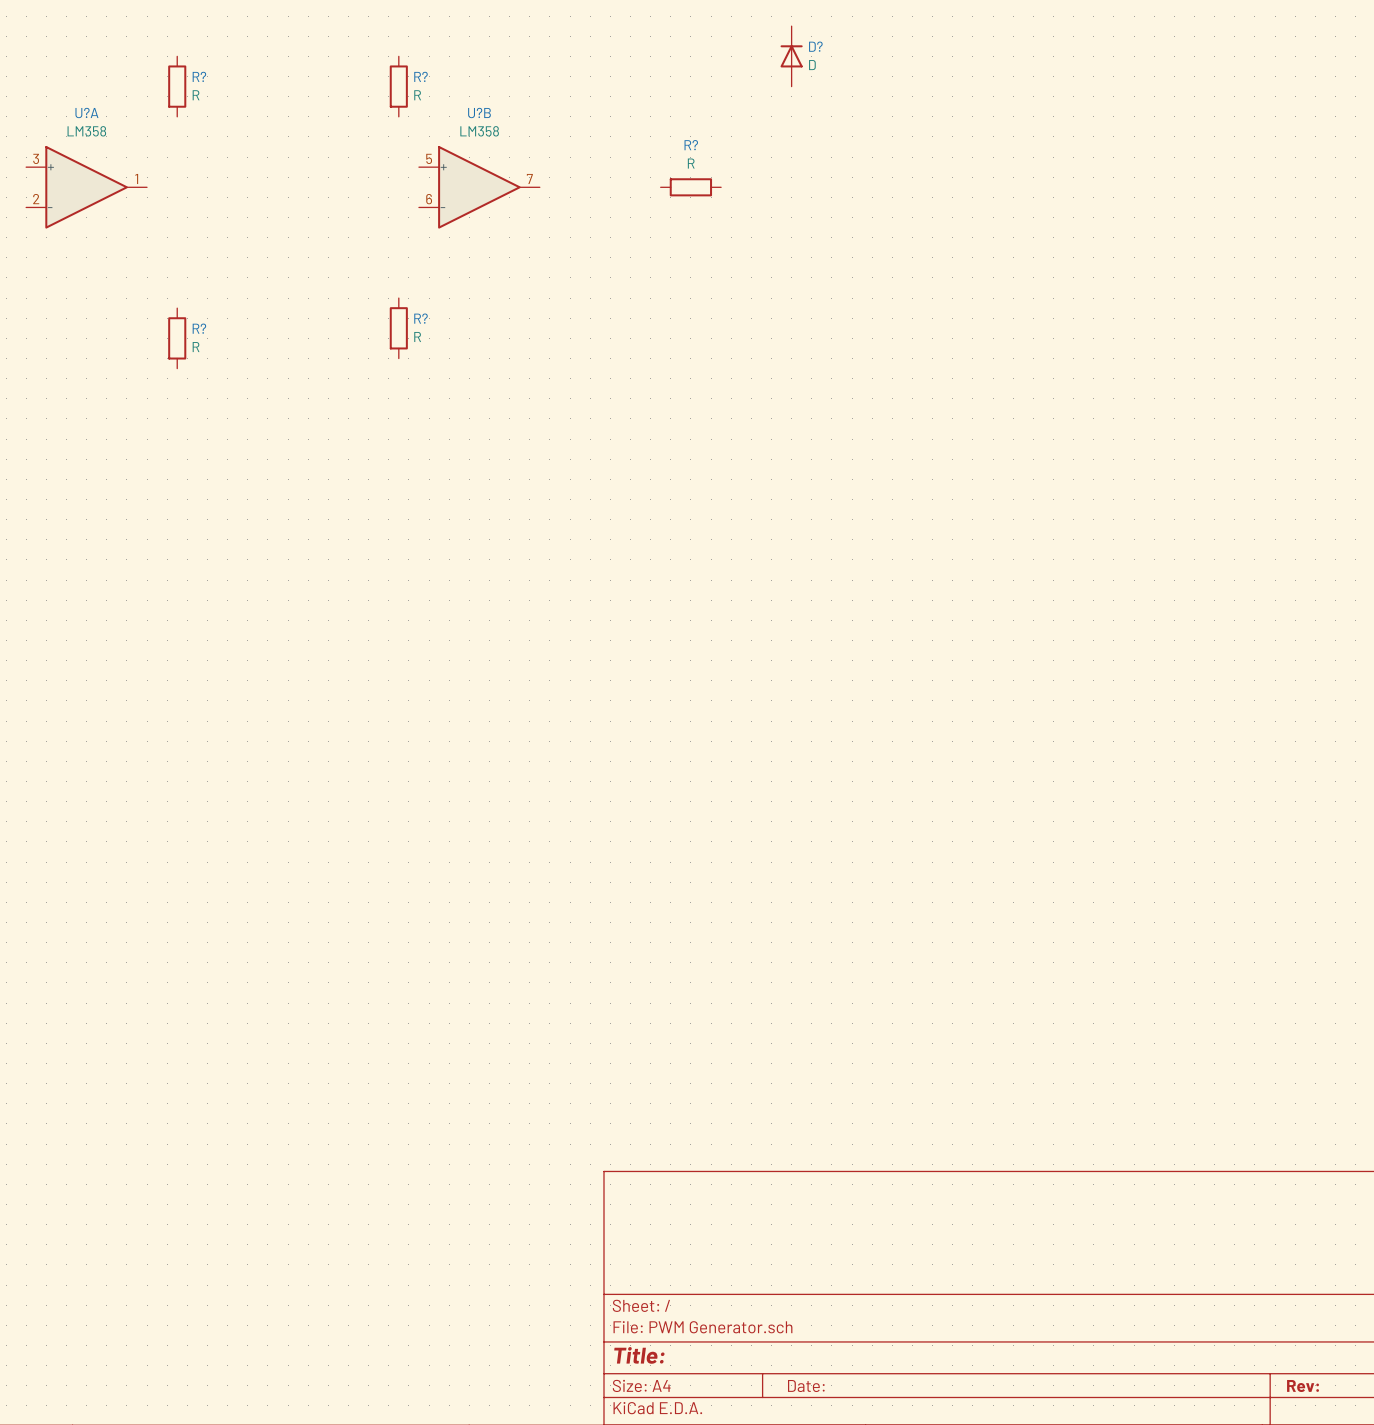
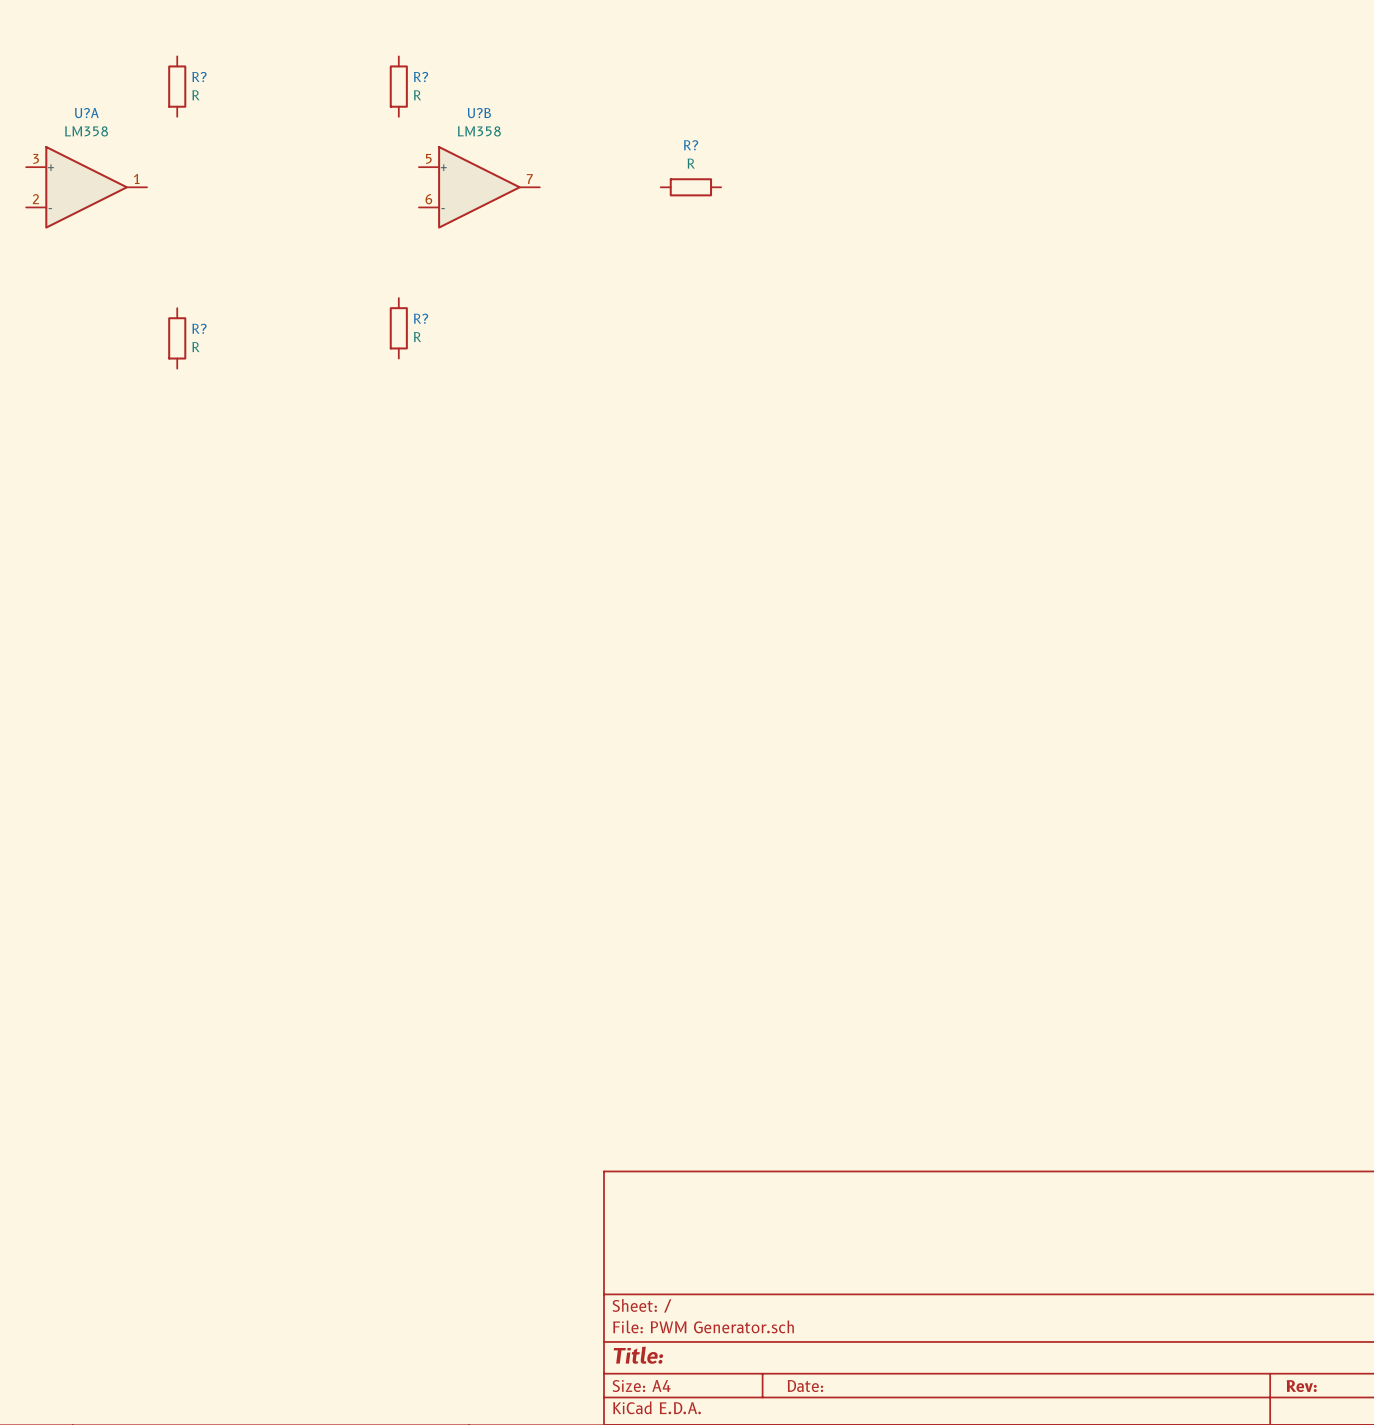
D?: D (791, 56) -> none

